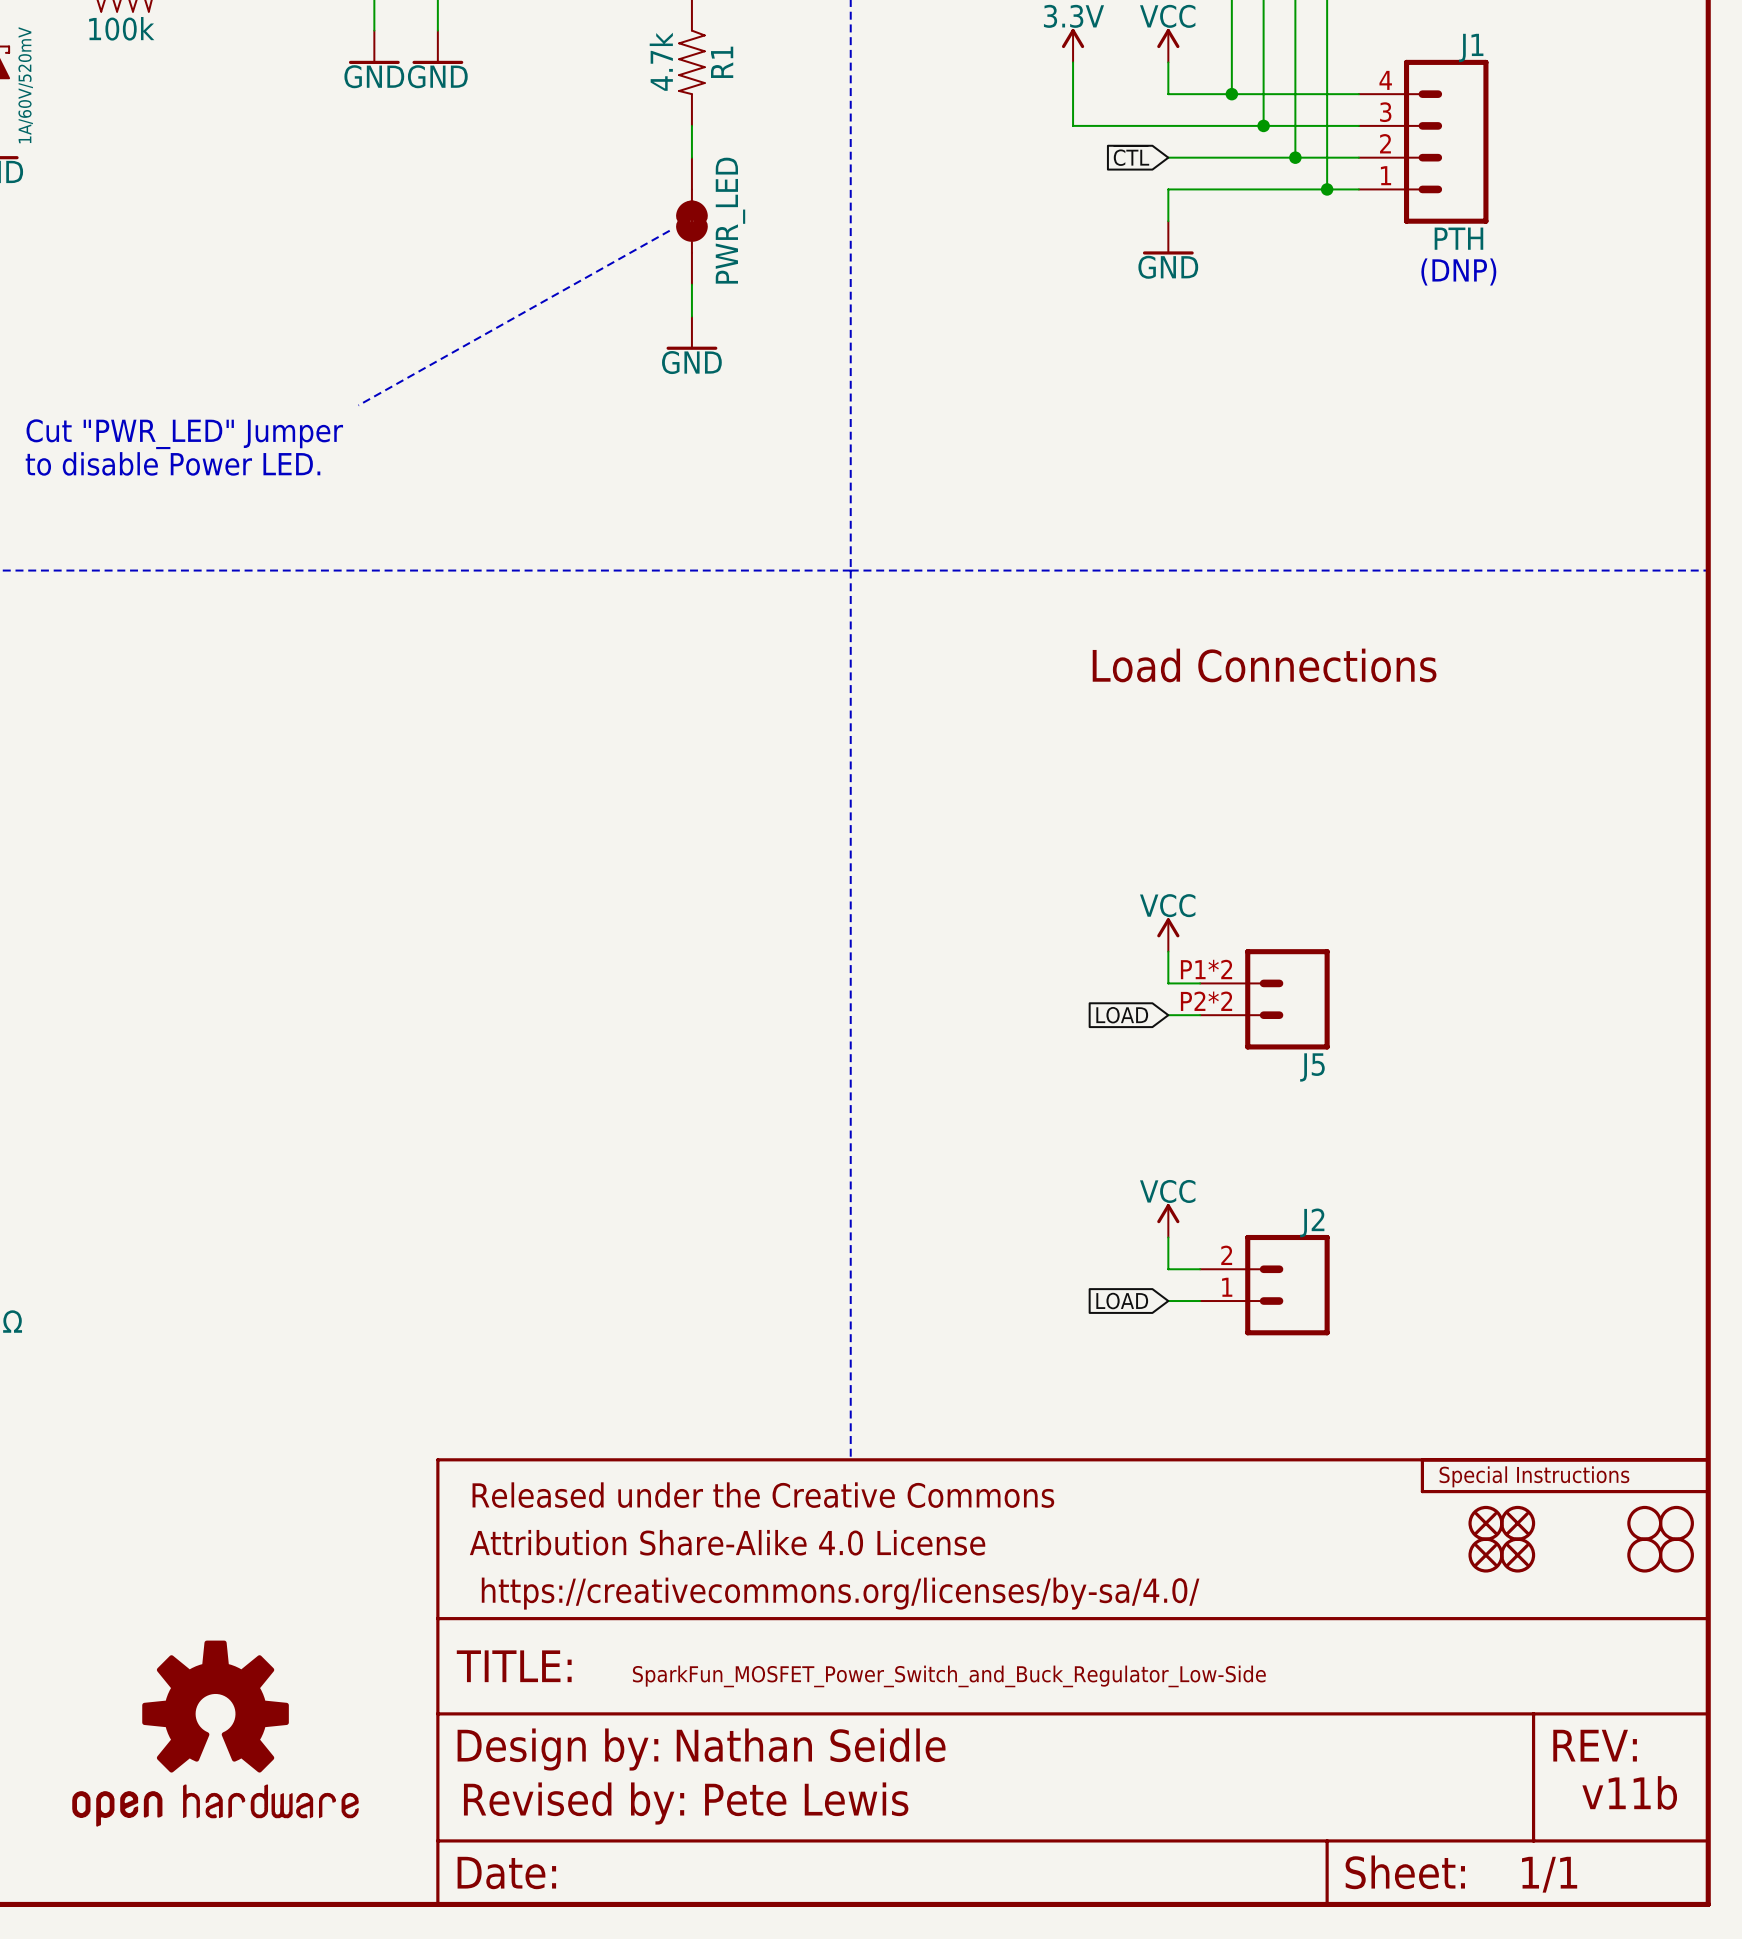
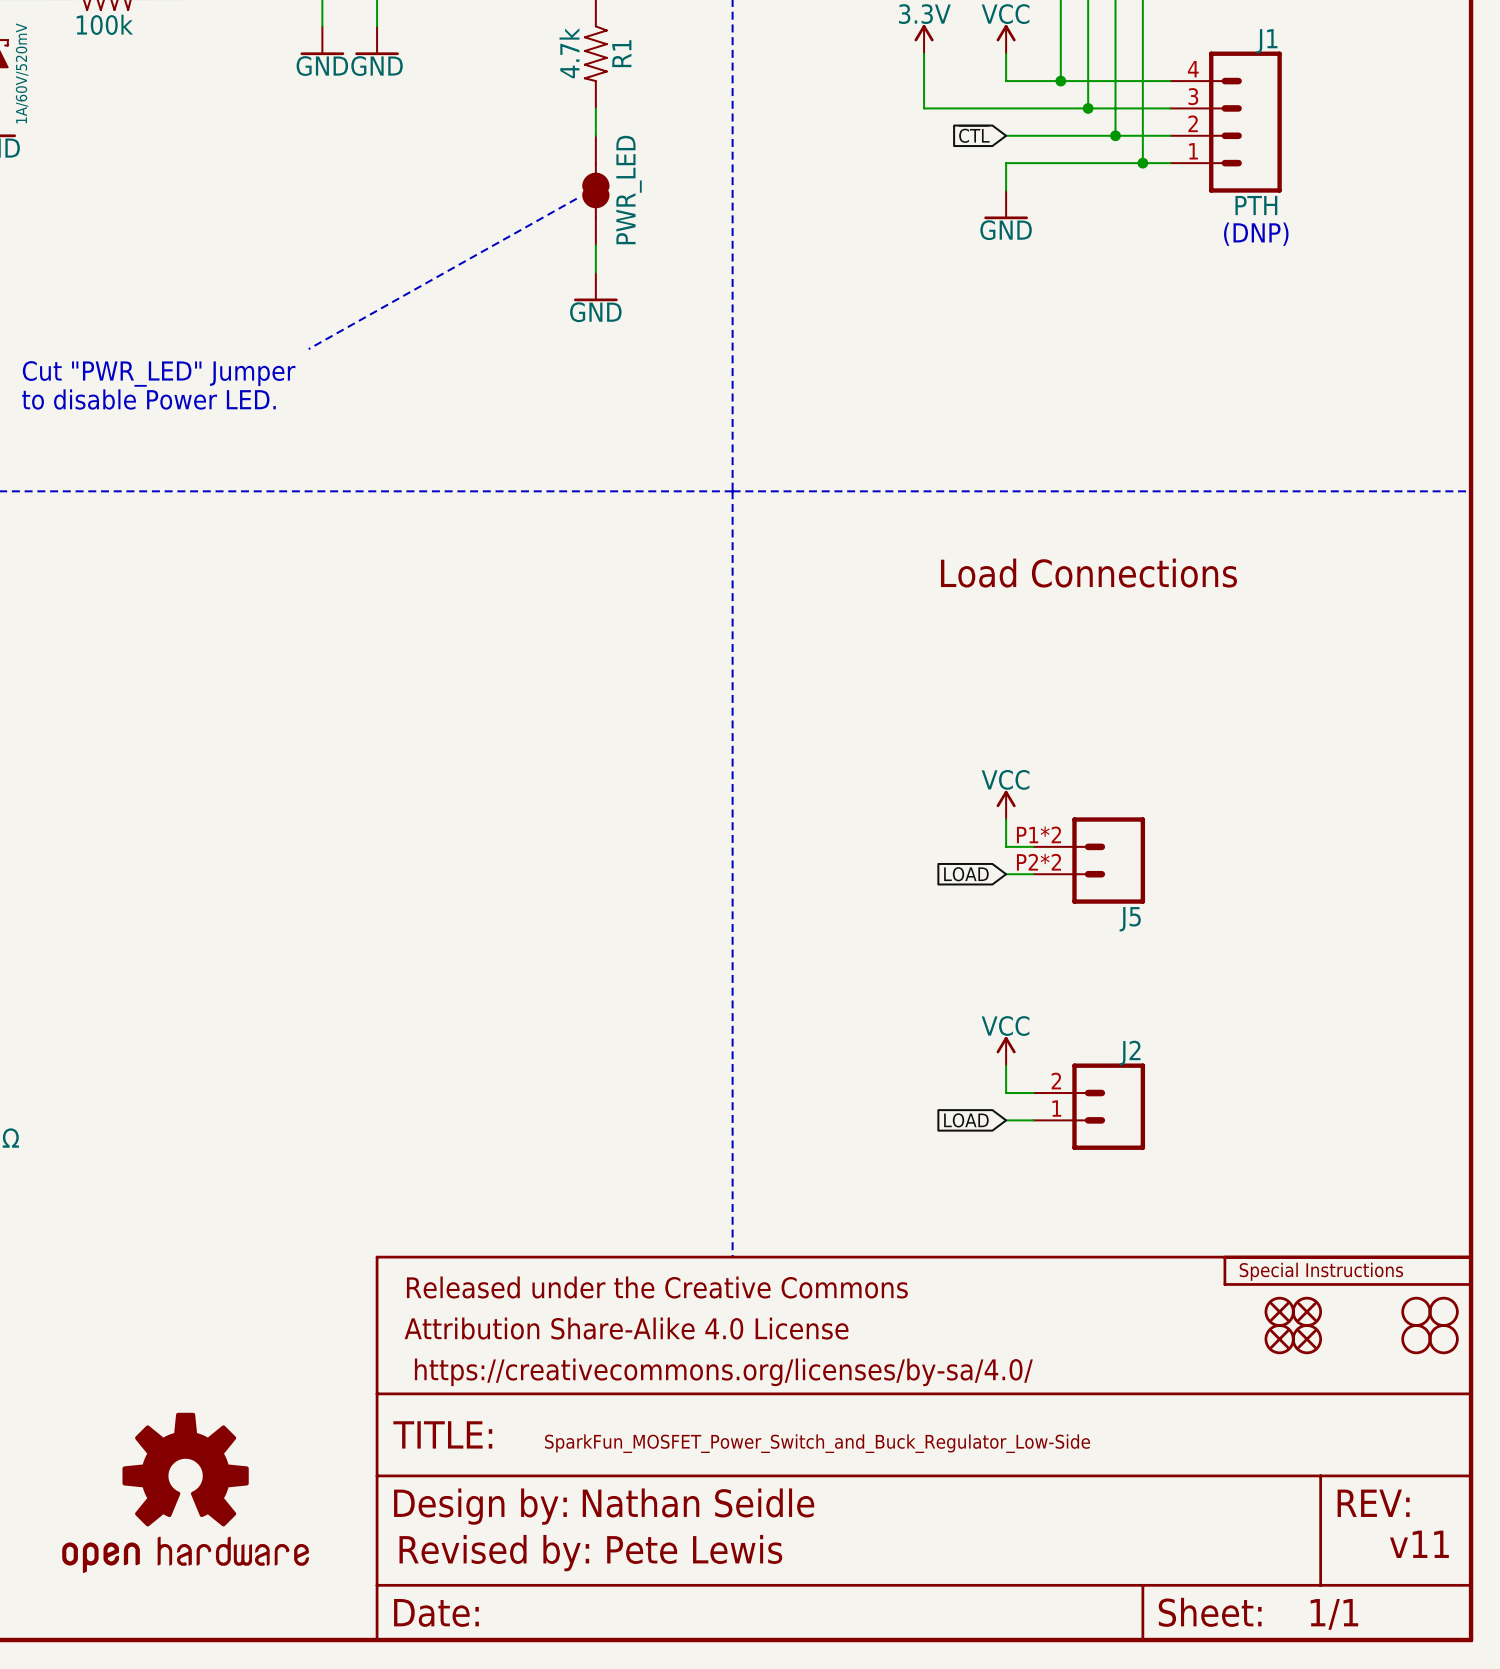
text: v11b (1629, 1792) -> v11 (1419, 1544)

